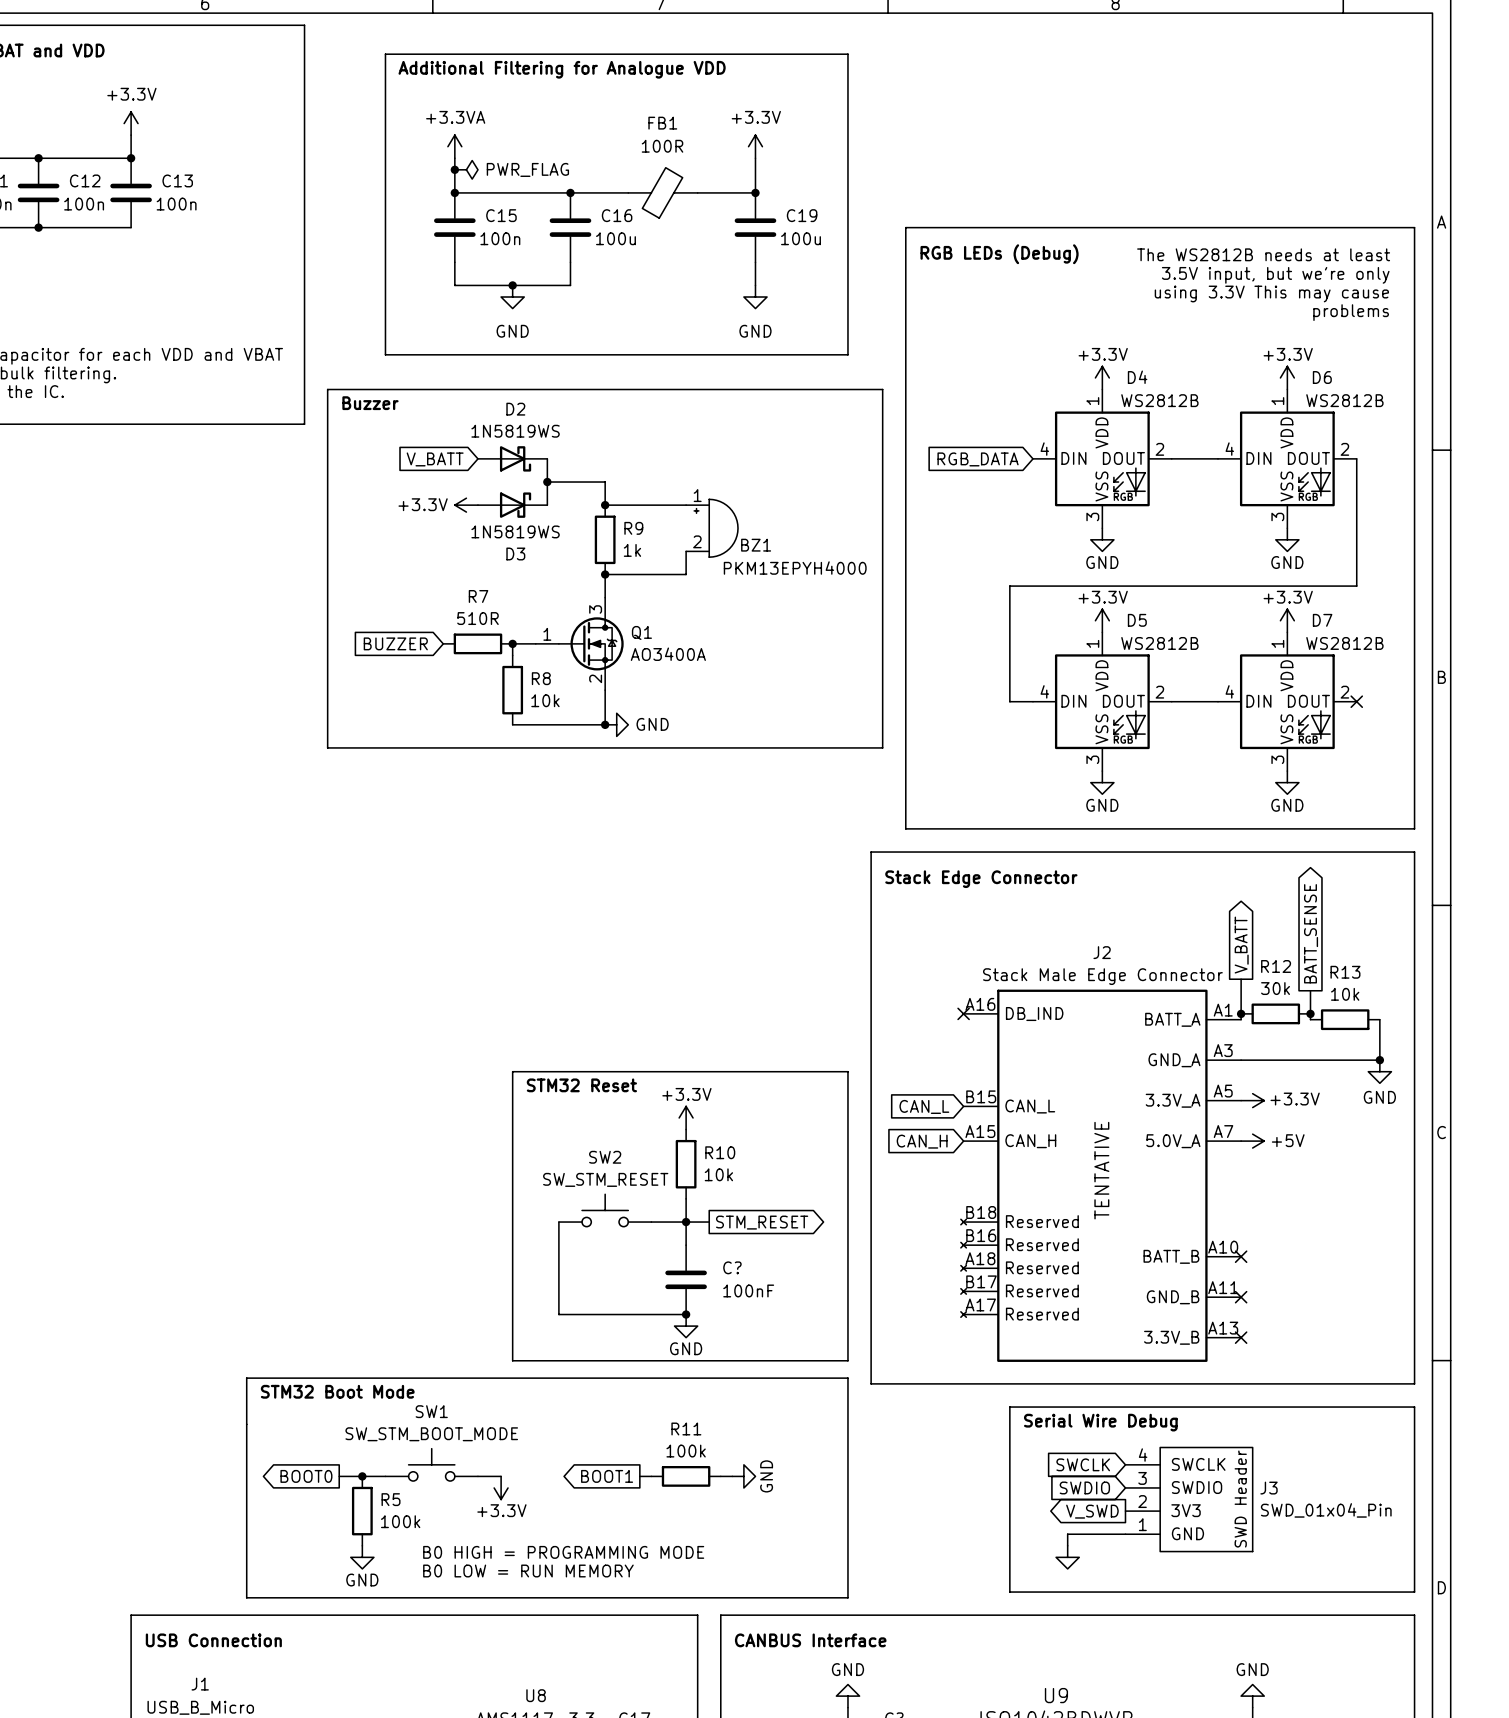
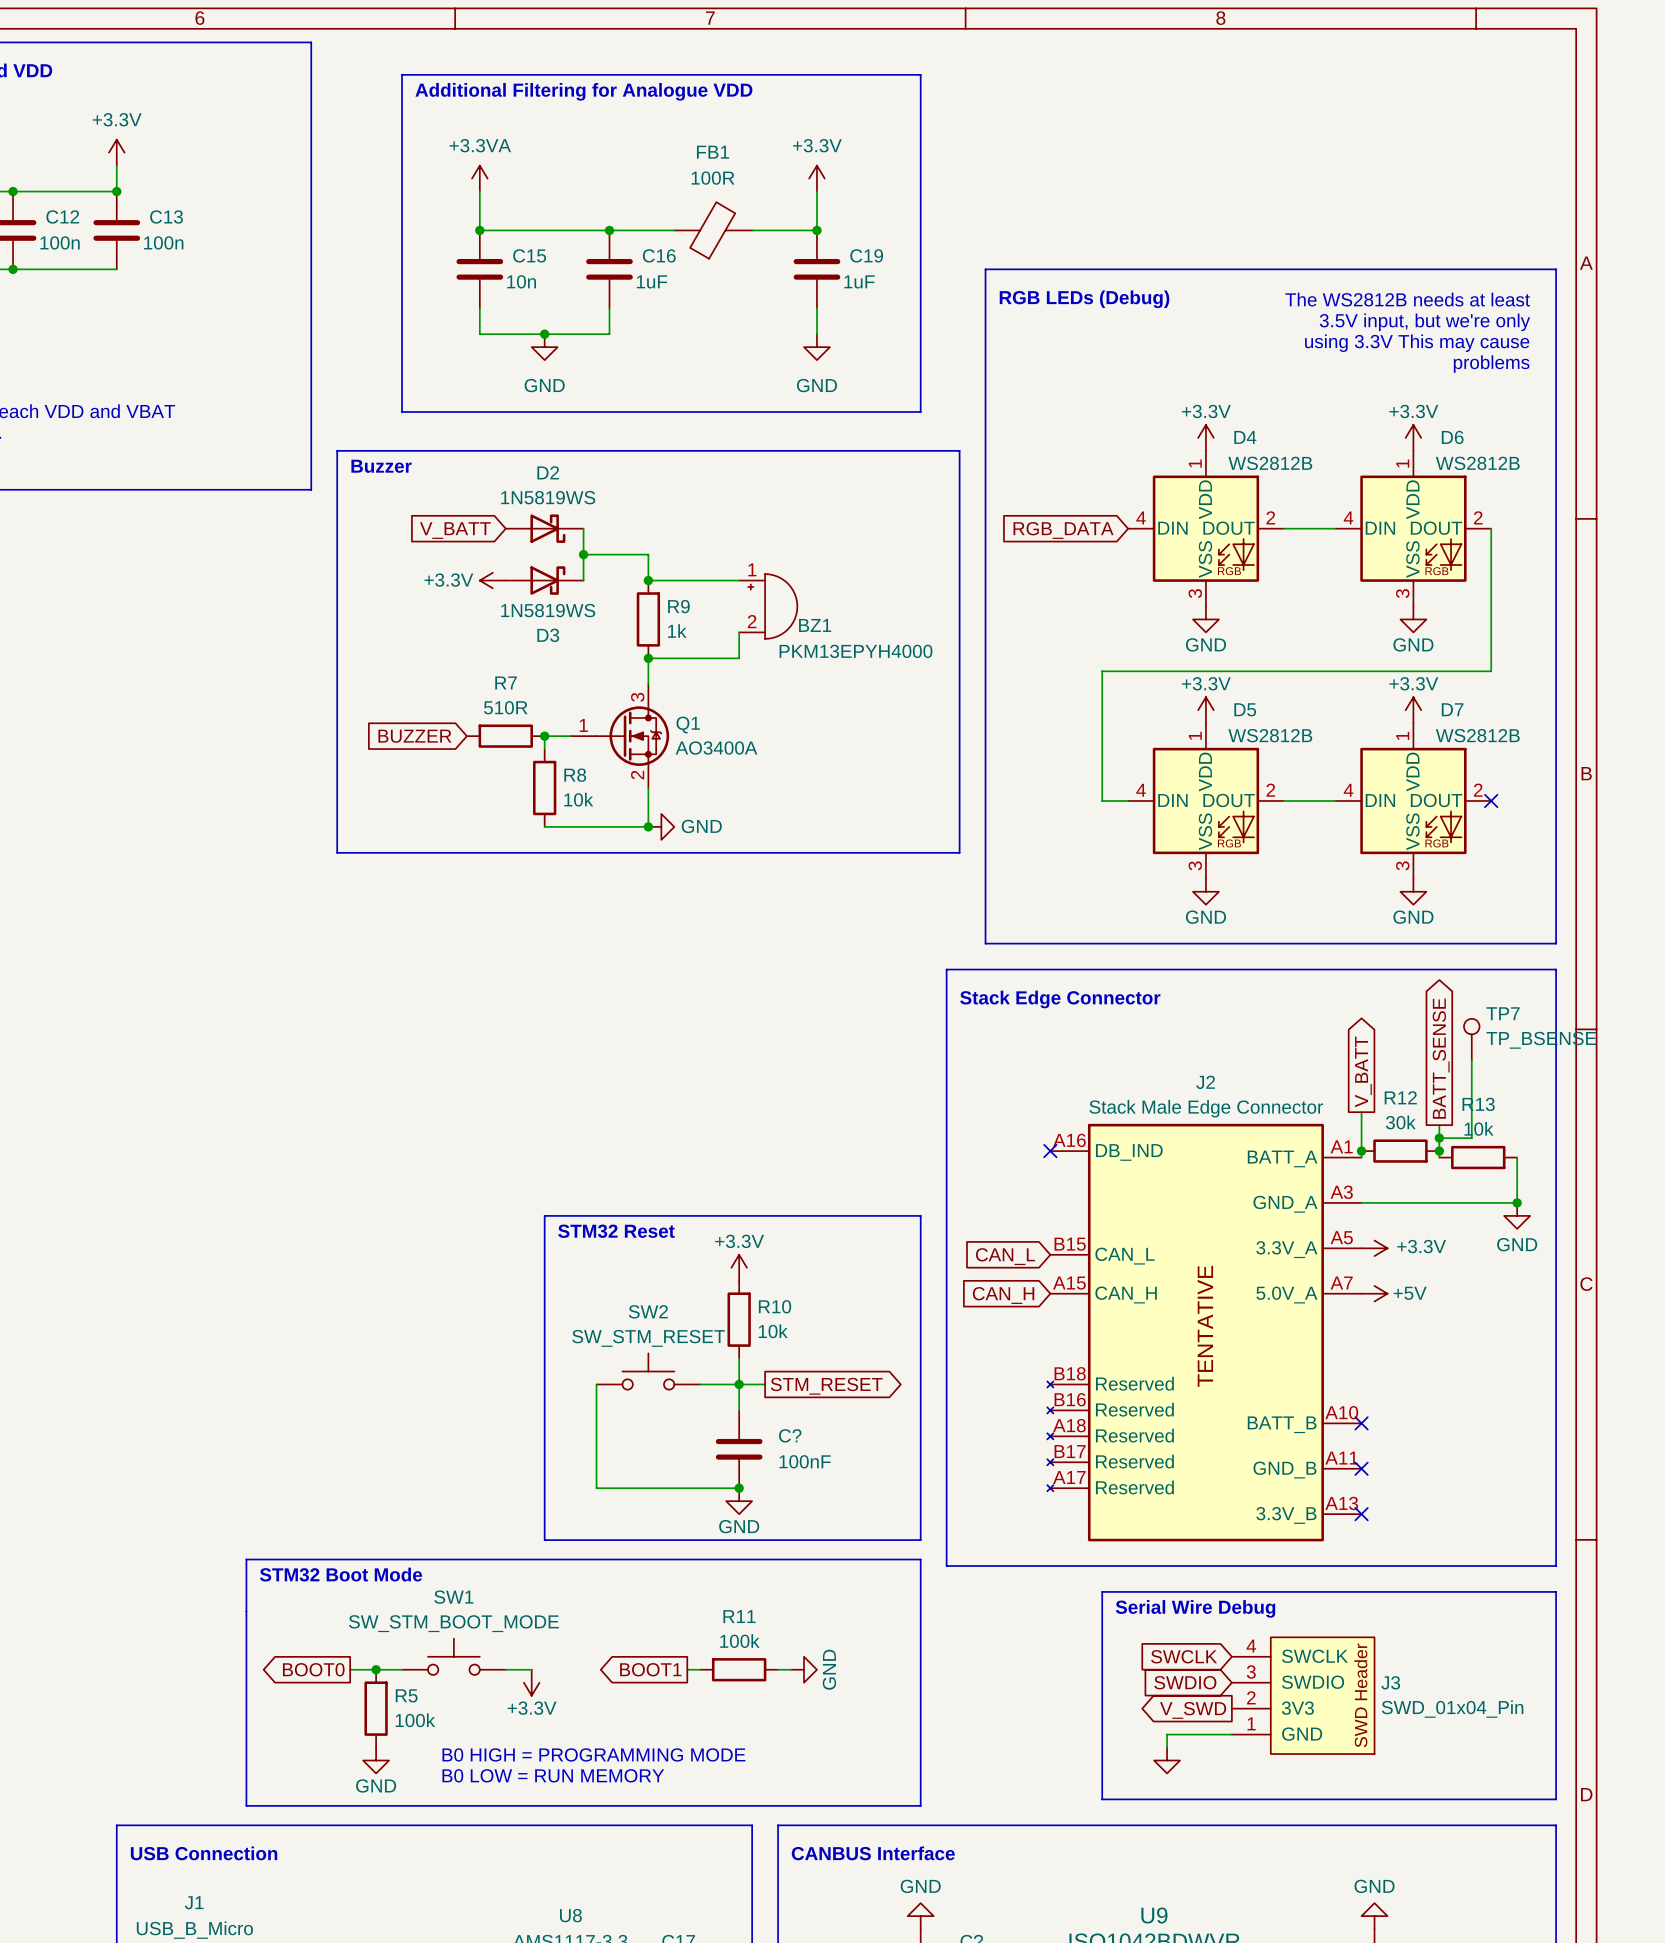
junction: (454, 169) -> none
power symbol: PWR_FLAG (466, 169) -> none
C15 value: 100n (500, 238) -> 10n (521, 281)
C16 value: 100u (615, 238) -> 1uF (652, 281)
C19 value: 100u (800, 238) -> 1uF (859, 281)
TP7: none -> TP_BSENSE (1471, 1039)
wire: none -> (1471, 1060) (1471, 1138) (1439, 1138)
junction: none -> (1439, 1138)

